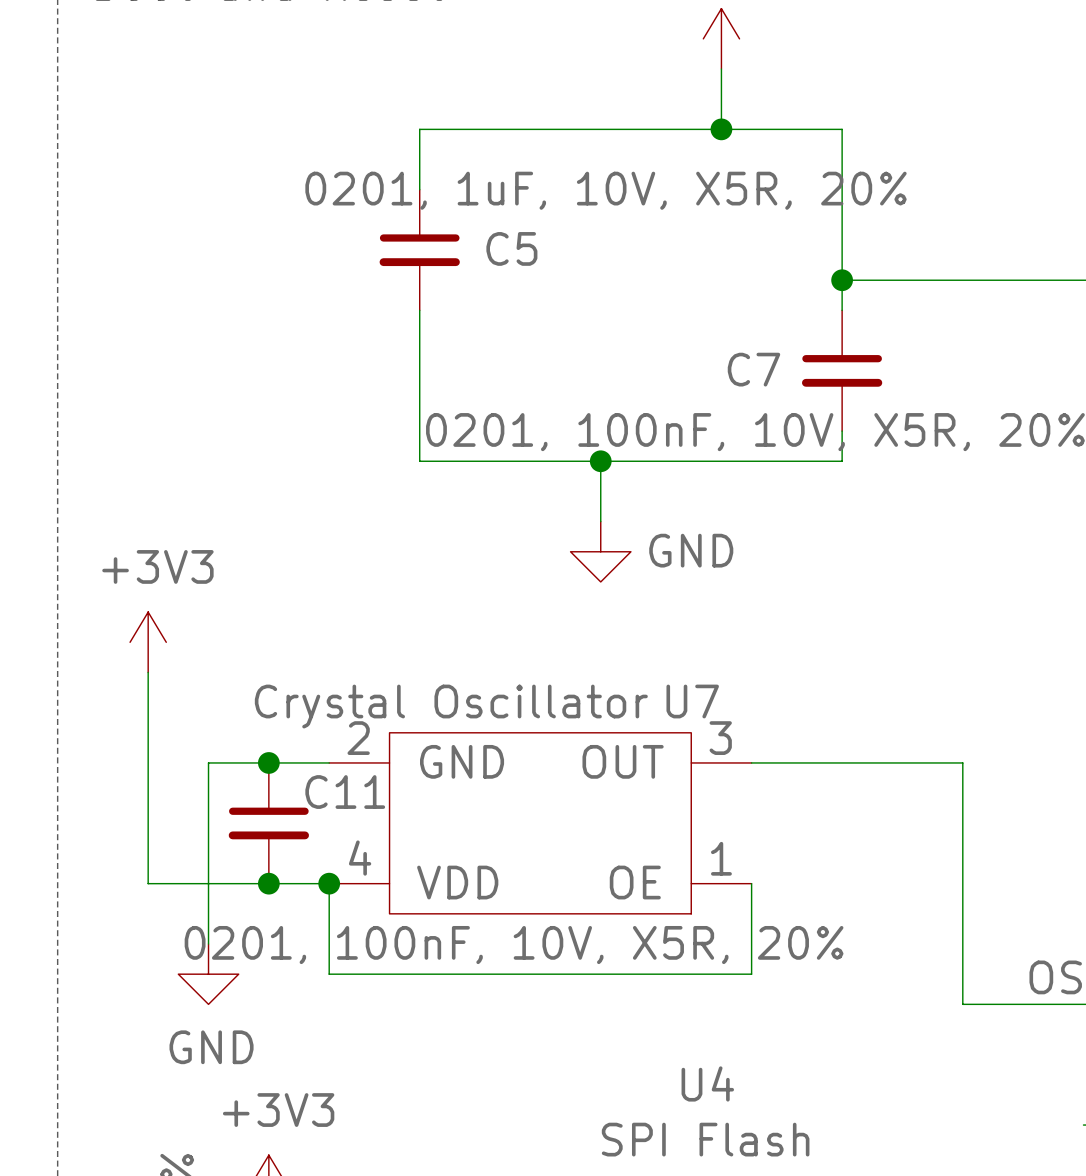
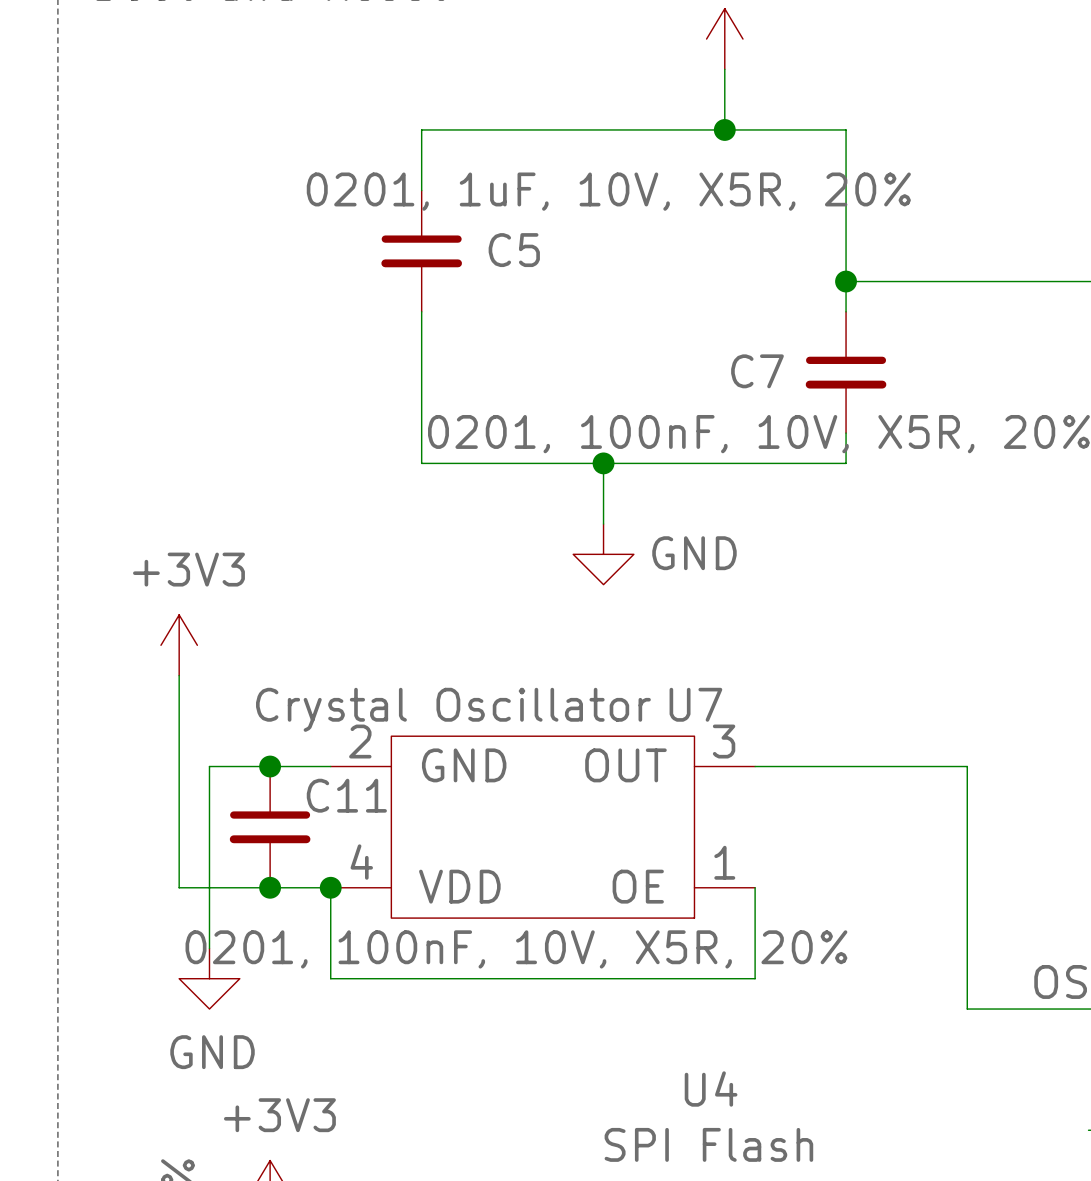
power symbol position: +3V3 (148, 642) -> +3V3 (179, 645)
wire: (148, 672) (148, 883) (178, 883) -> (179, 675) (179, 887)

